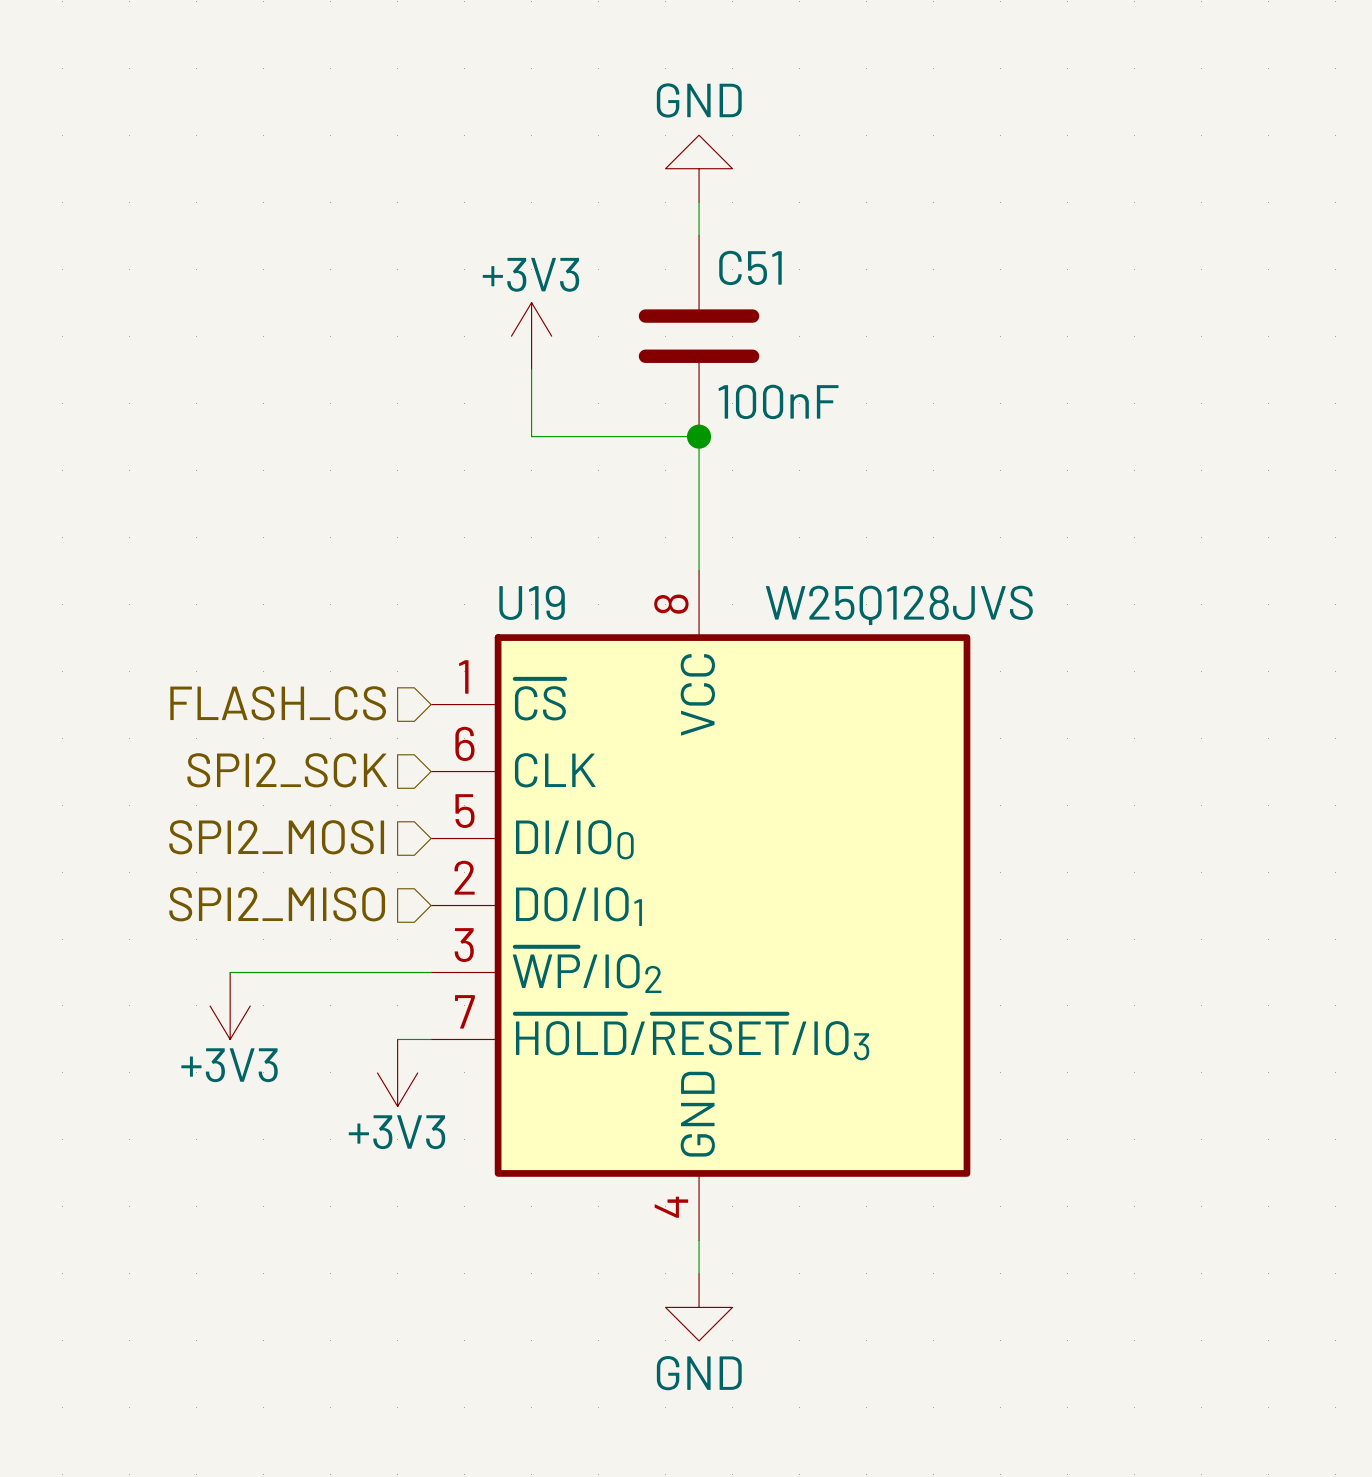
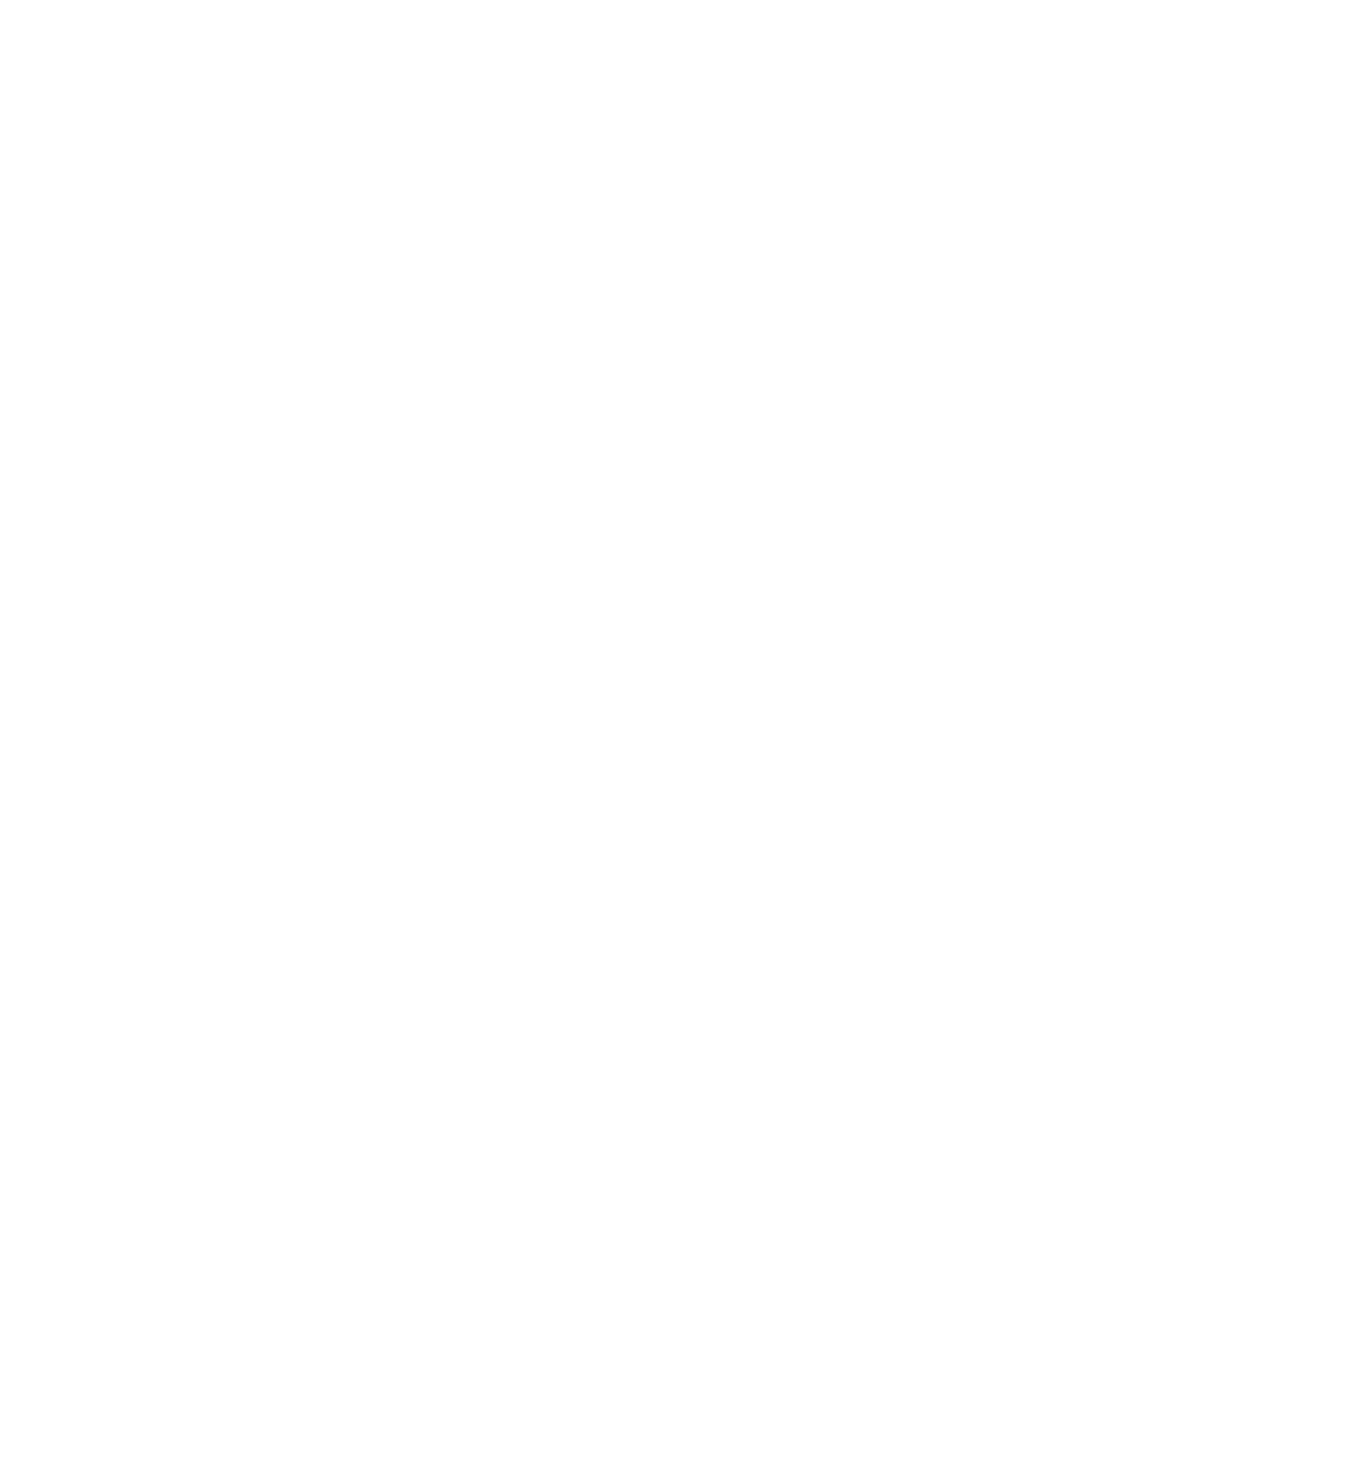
power symbol: GND (699, 168) -> none
wire: (699, 202) (699, 235) -> none
power symbol: +3V3 (531, 336) -> none
C51: 100nF (699, 336) -> none
wire: (531, 369) (531, 436) (699, 436) (699, 570) -> none
junction: (699, 436) -> none
hierarchical label: FLASH_CS (278, 703) -> none
hierarchical label: SPI2_SCK (287, 770) -> none
hierarchical label: SPI2_MOSI (276, 837) -> none
hierarchical label: SPI2_MISO (277, 904) -> none
U19: W25Q128JVS (700, 905) -> none
wire: (230, 972) (431, 972) -> none
power symbol: +3V3 (230, 1005) -> none
wire: (397, 1039) (431, 1039) -> none
power symbol: +3V3 (397, 1072) -> none
wire: (699, 1240) (699, 1273) -> none
power symbol: GND (699, 1307) -> none

